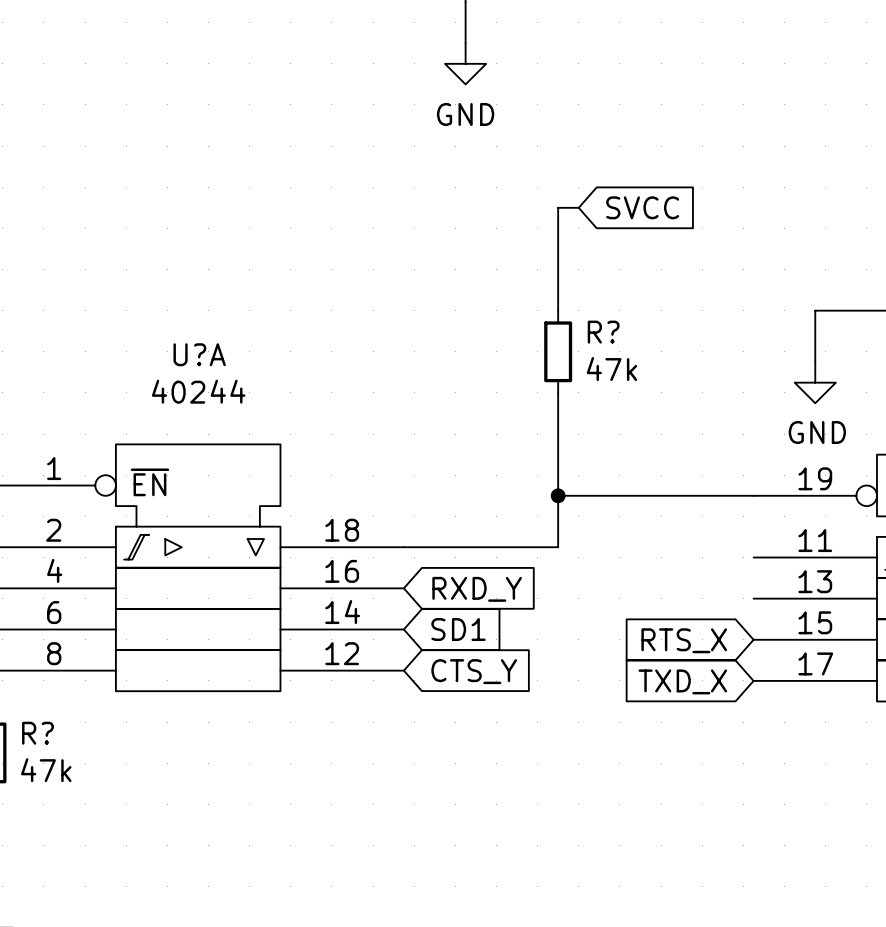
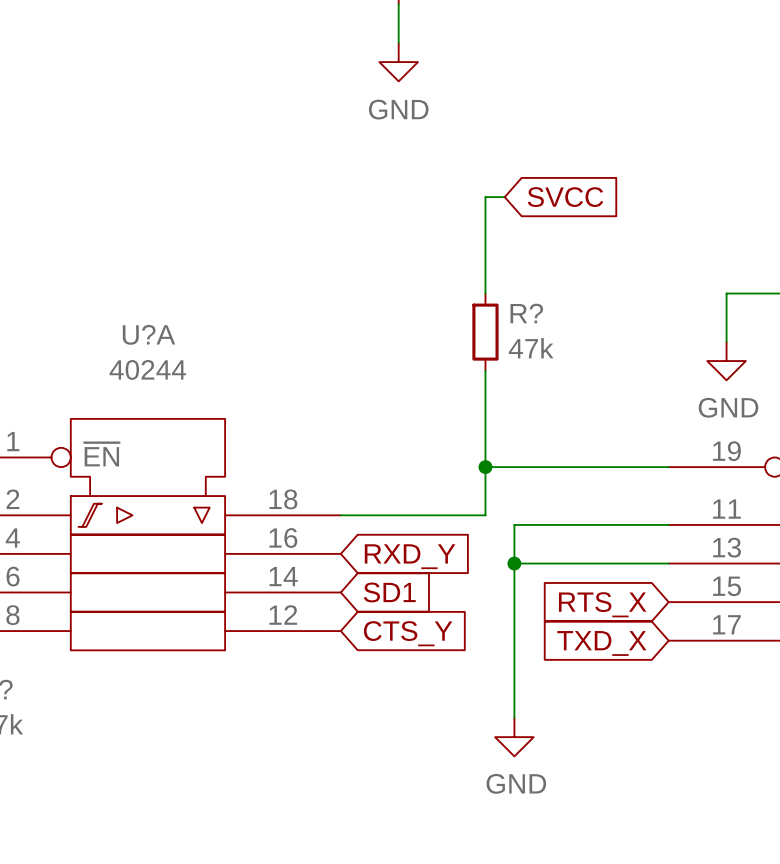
wire: none -> (668, 524) (514, 524) (514, 717)
wire: none -> (514, 563) (668, 563)
junction: none -> (514, 563)
power symbol: none -> GND (514, 737)

